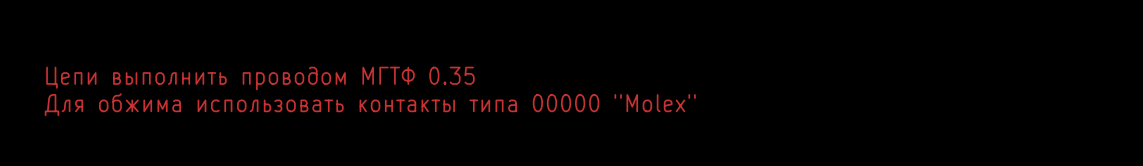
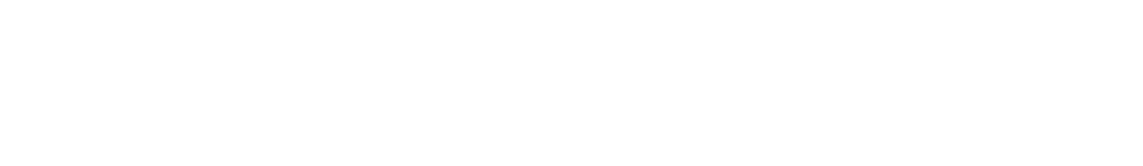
text: Цепи выполнить проводом МГТФ 0.35 (260, 78) -> none
text: Для обжима использовать контакты типа 00000 "Molex" (370, 104) -> none

